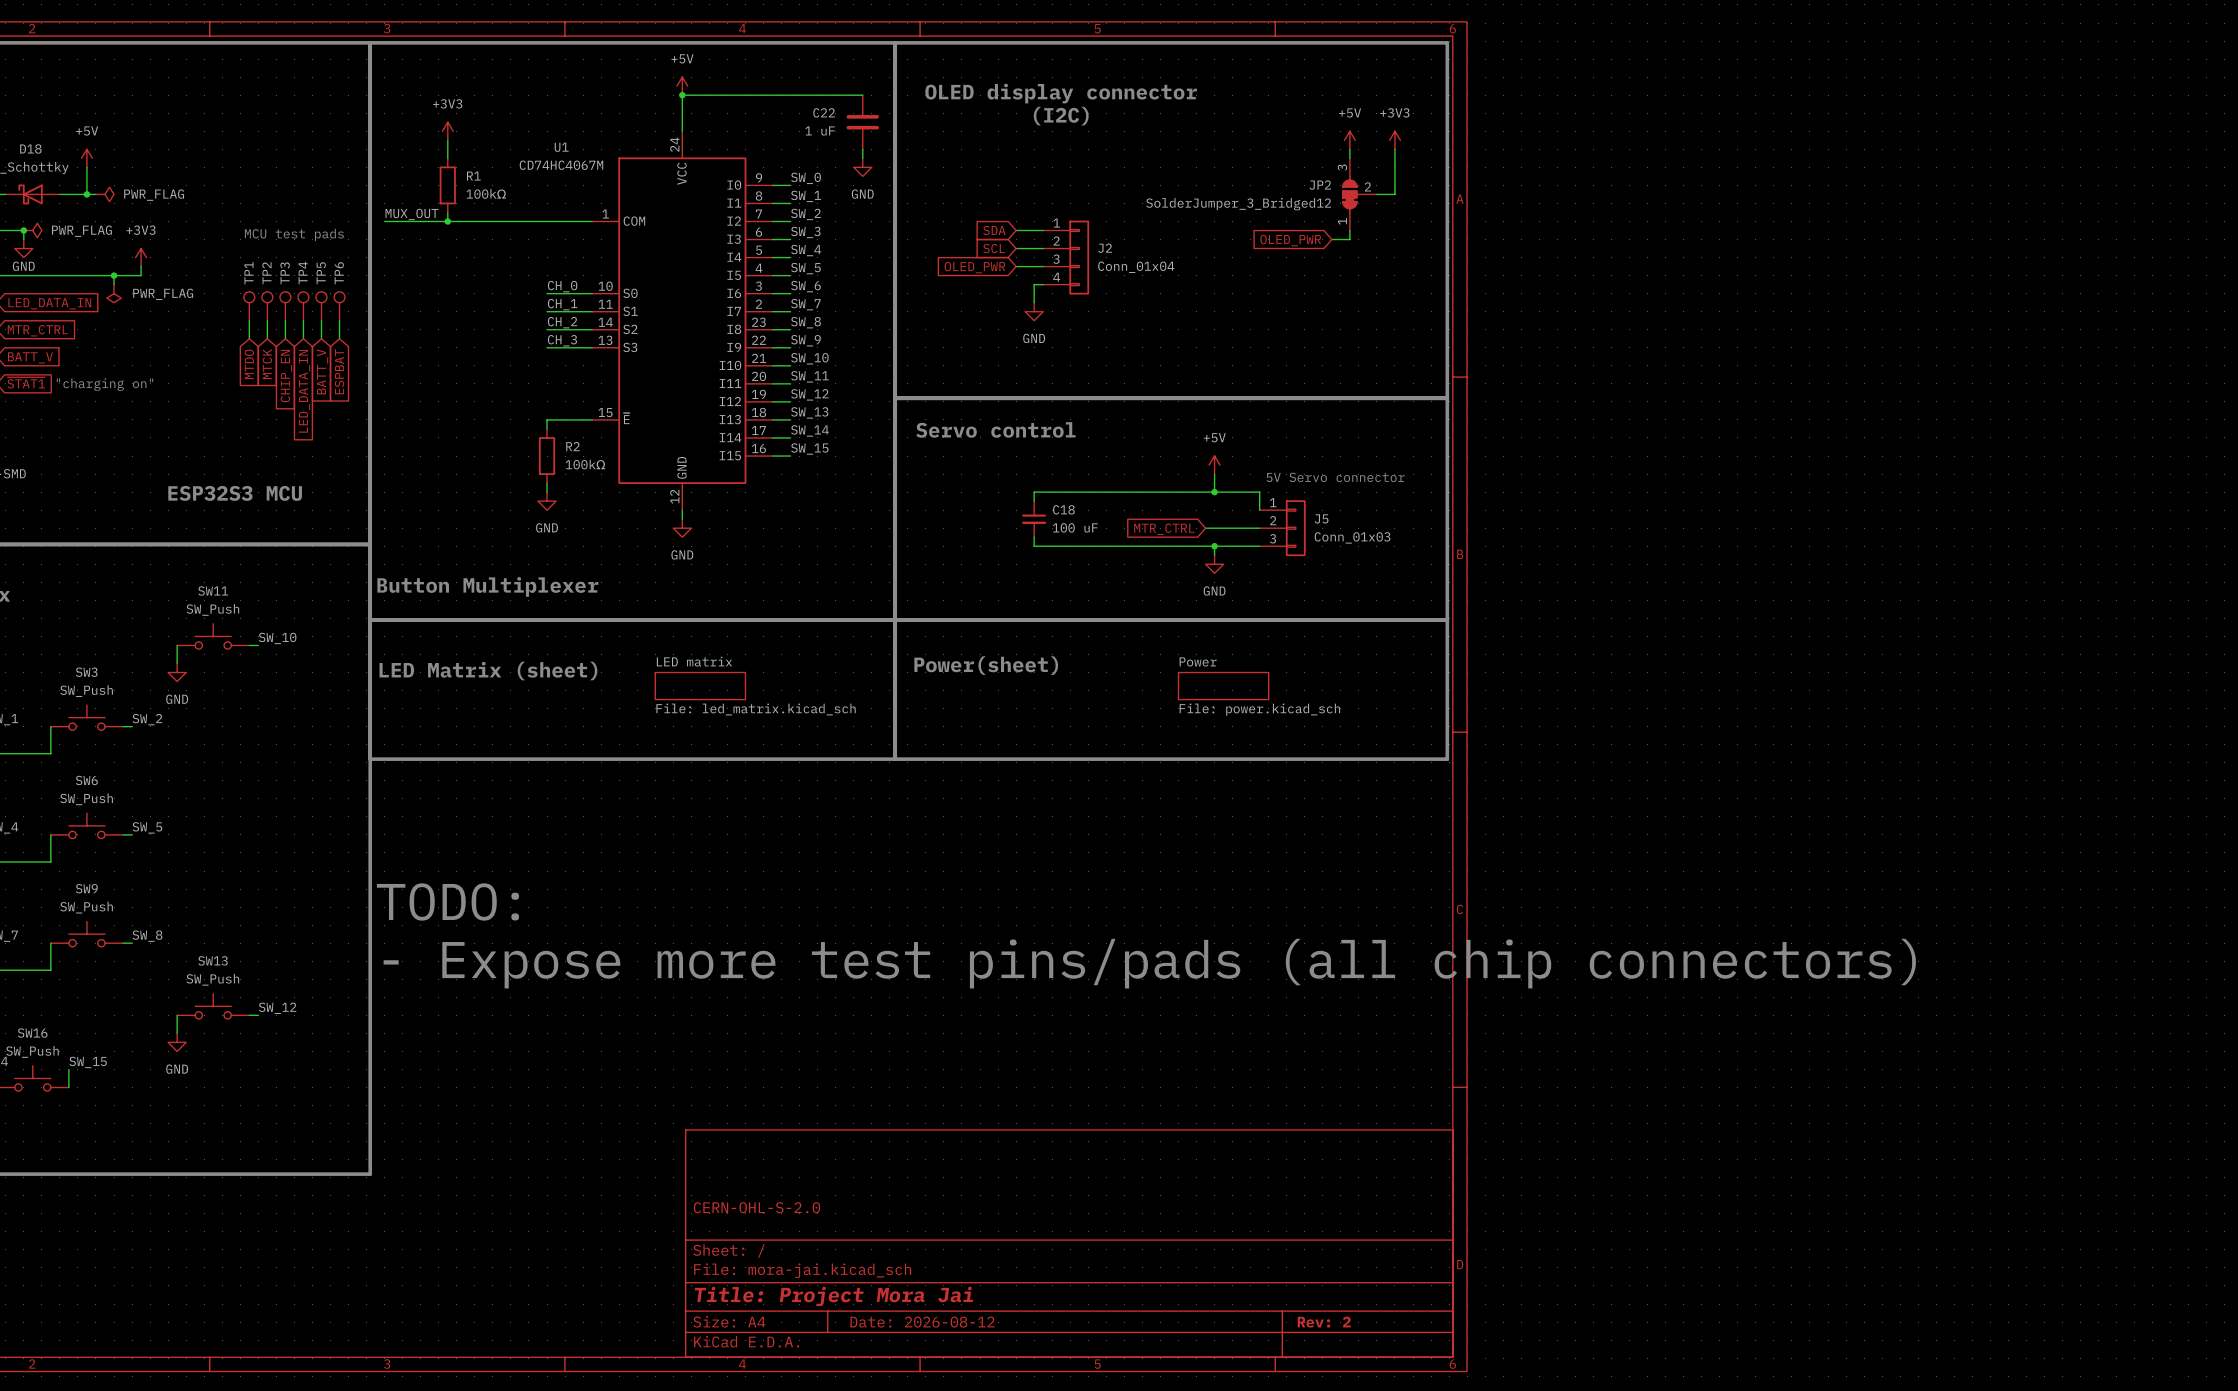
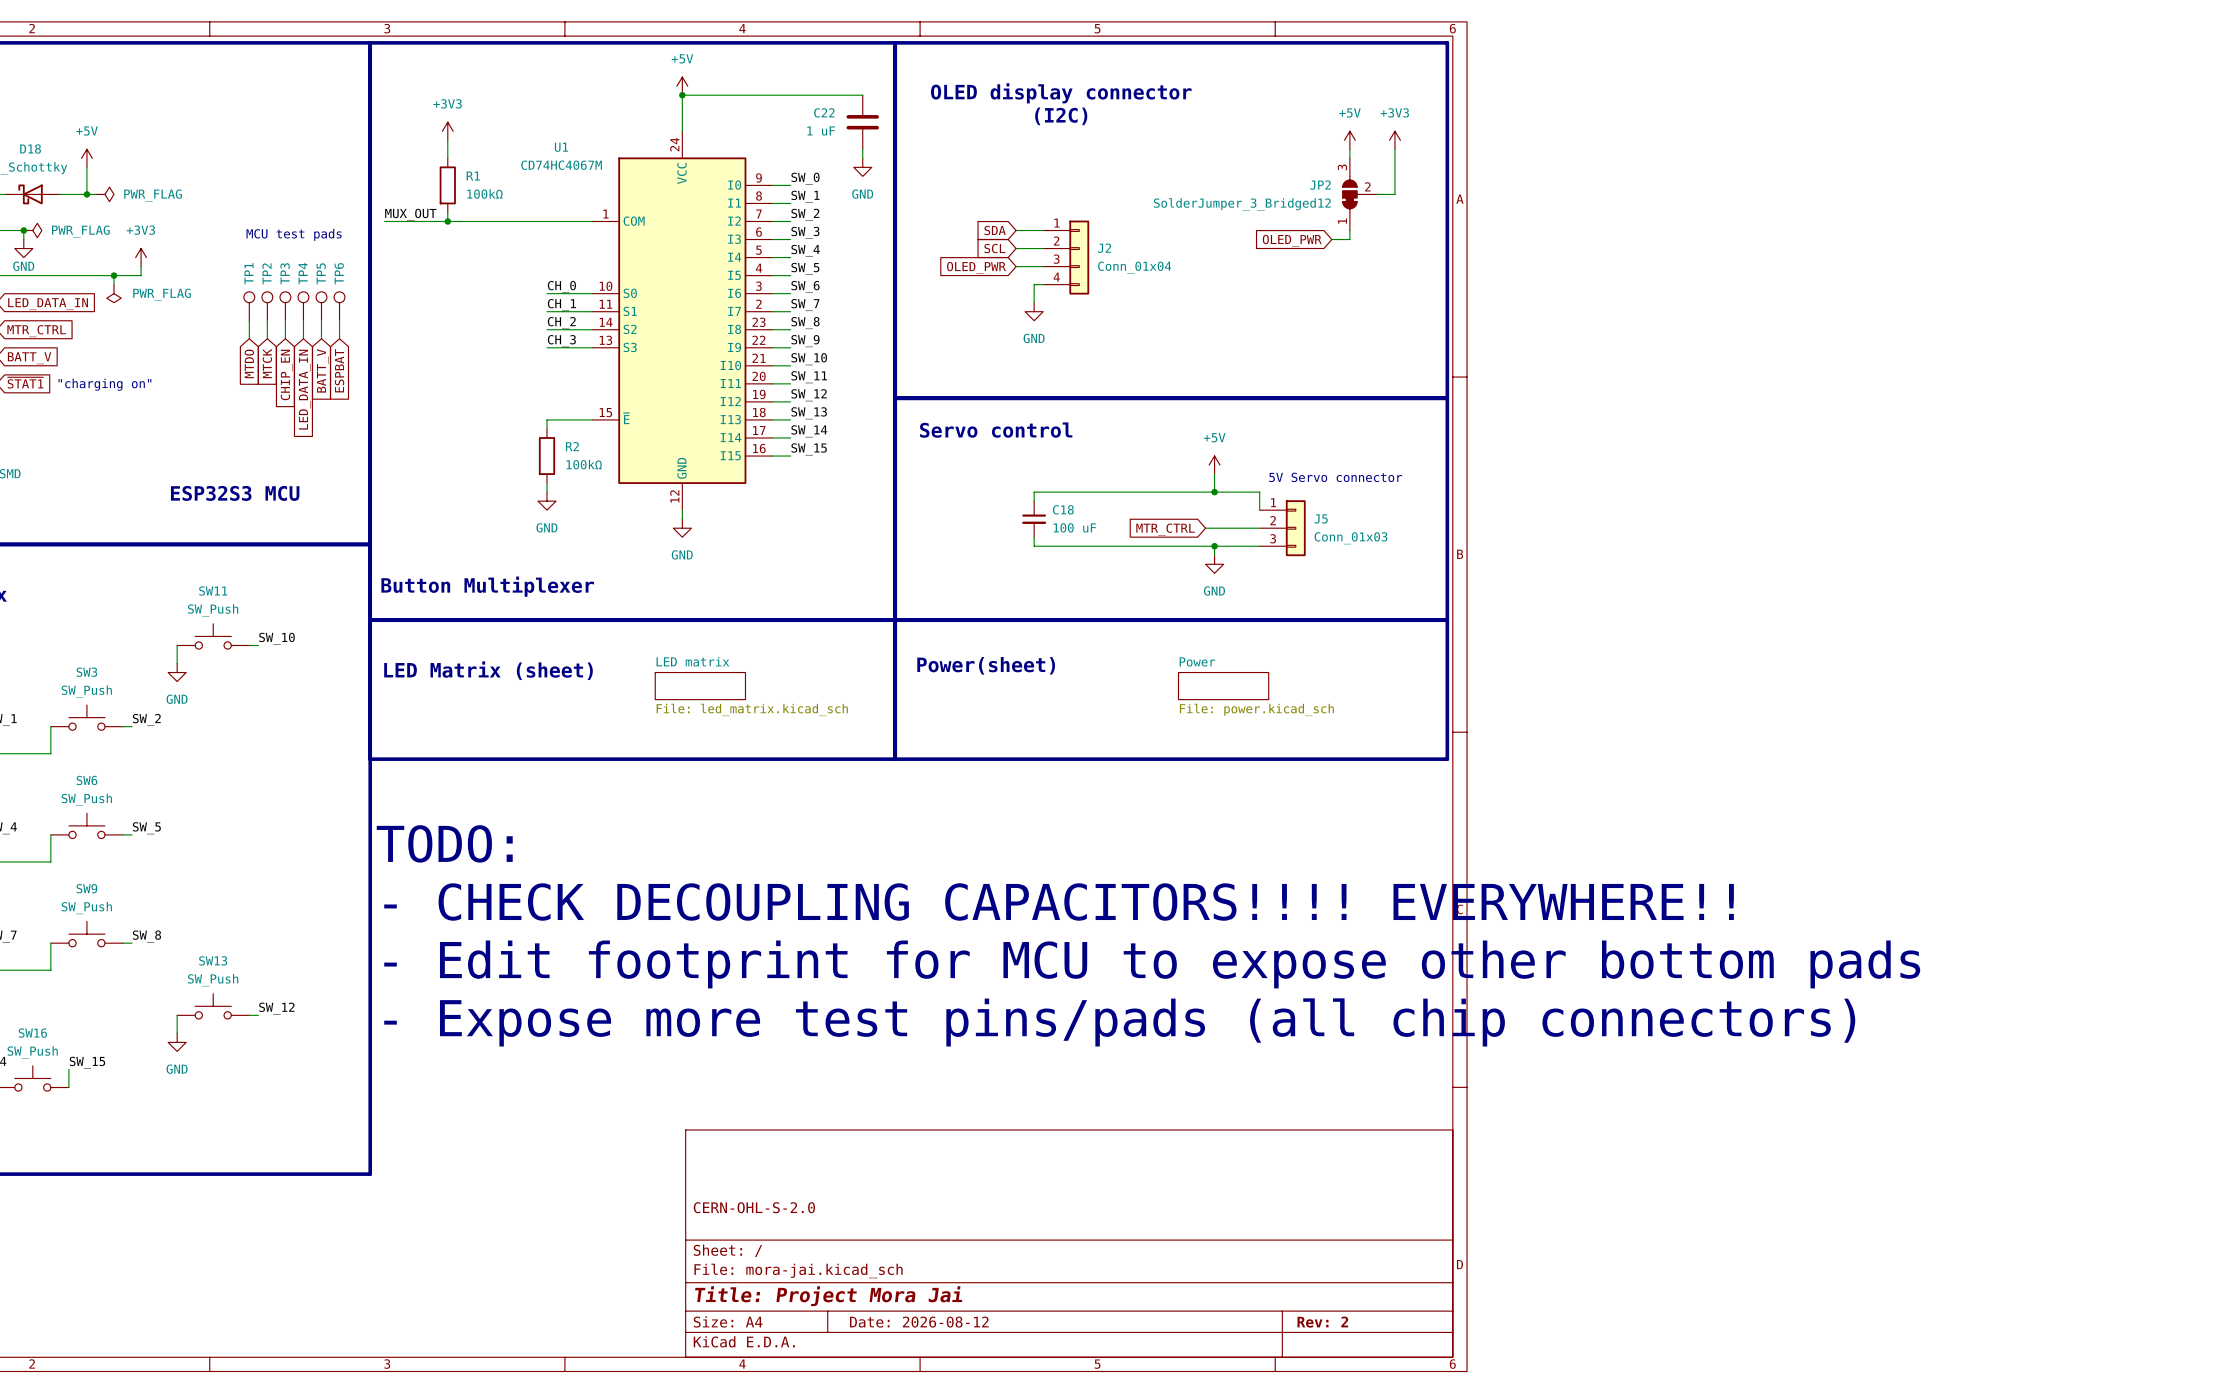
text: none -> TODO: (444, 843)
text: TODO: (447, 901) -> - CHECK DECOUPLING CAPACITORS!!!! EVERYWHERE!! (1059, 902)
text: - Expose more test pins/pads (all chip connectors) (1149, 963) -> - Edit footprint for MCU to expose other bottom pads (1152, 964)
text: none -> - Expose more test pins/pads (all chip connectors) (1119, 1022)

